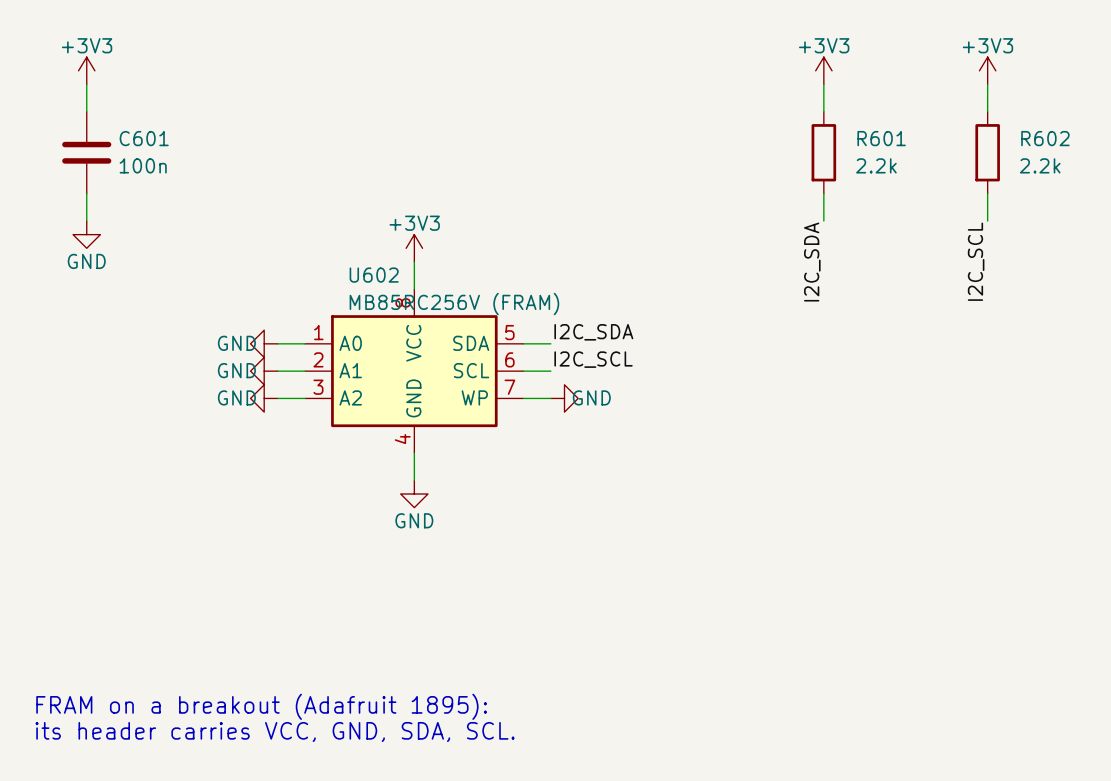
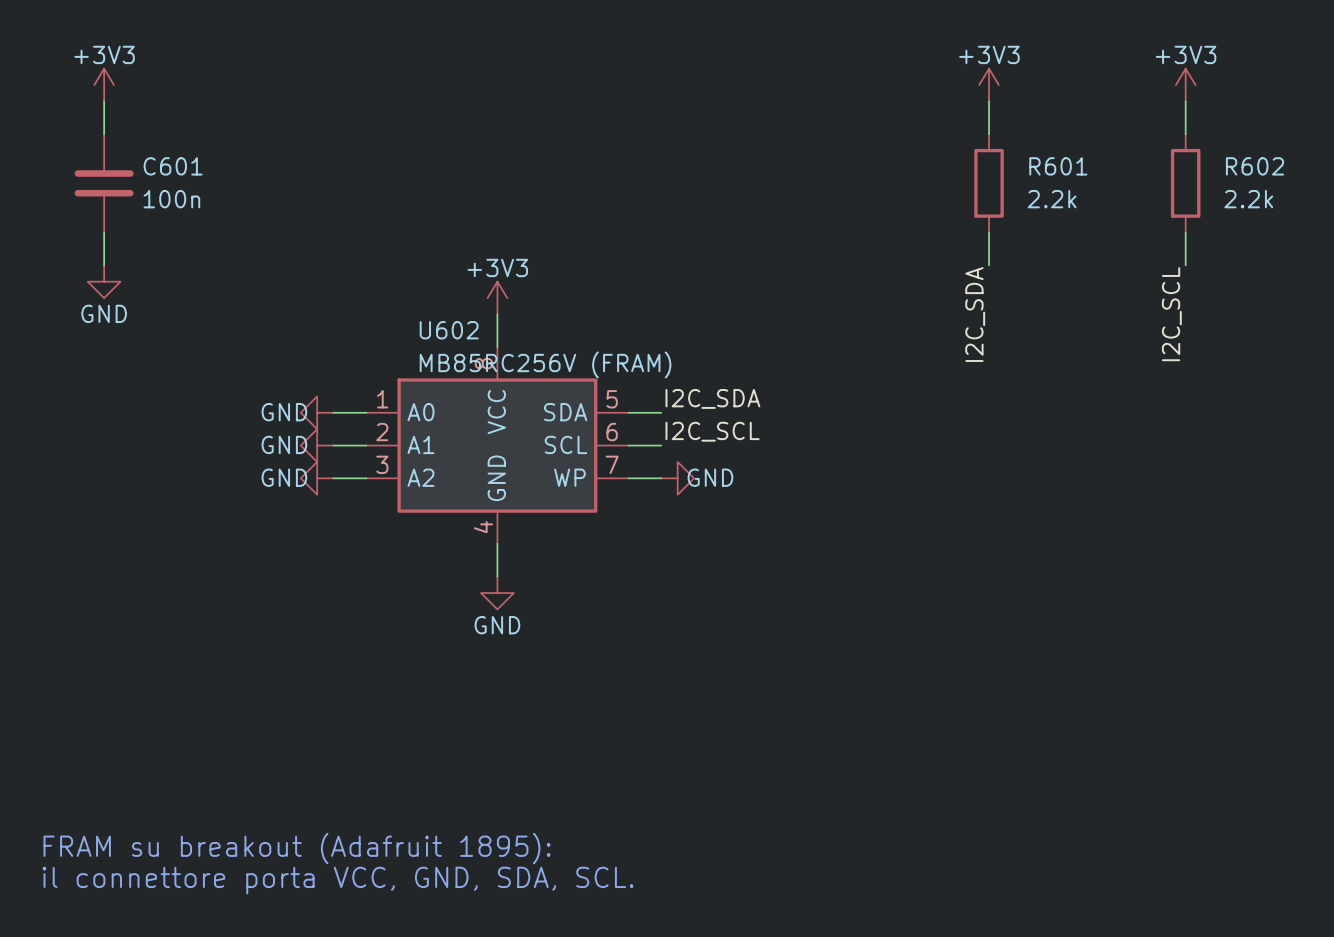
text: FRAM on a breakout (Adafruit 1895): (261, 706) -> FRAM su breakout (Adafruit 1895): (297, 848)
text: its header carries VCC, GND, SDA, SCL. (275, 732) -> il connettore porta VCC, GND, SDA, SCL. (338, 880)

